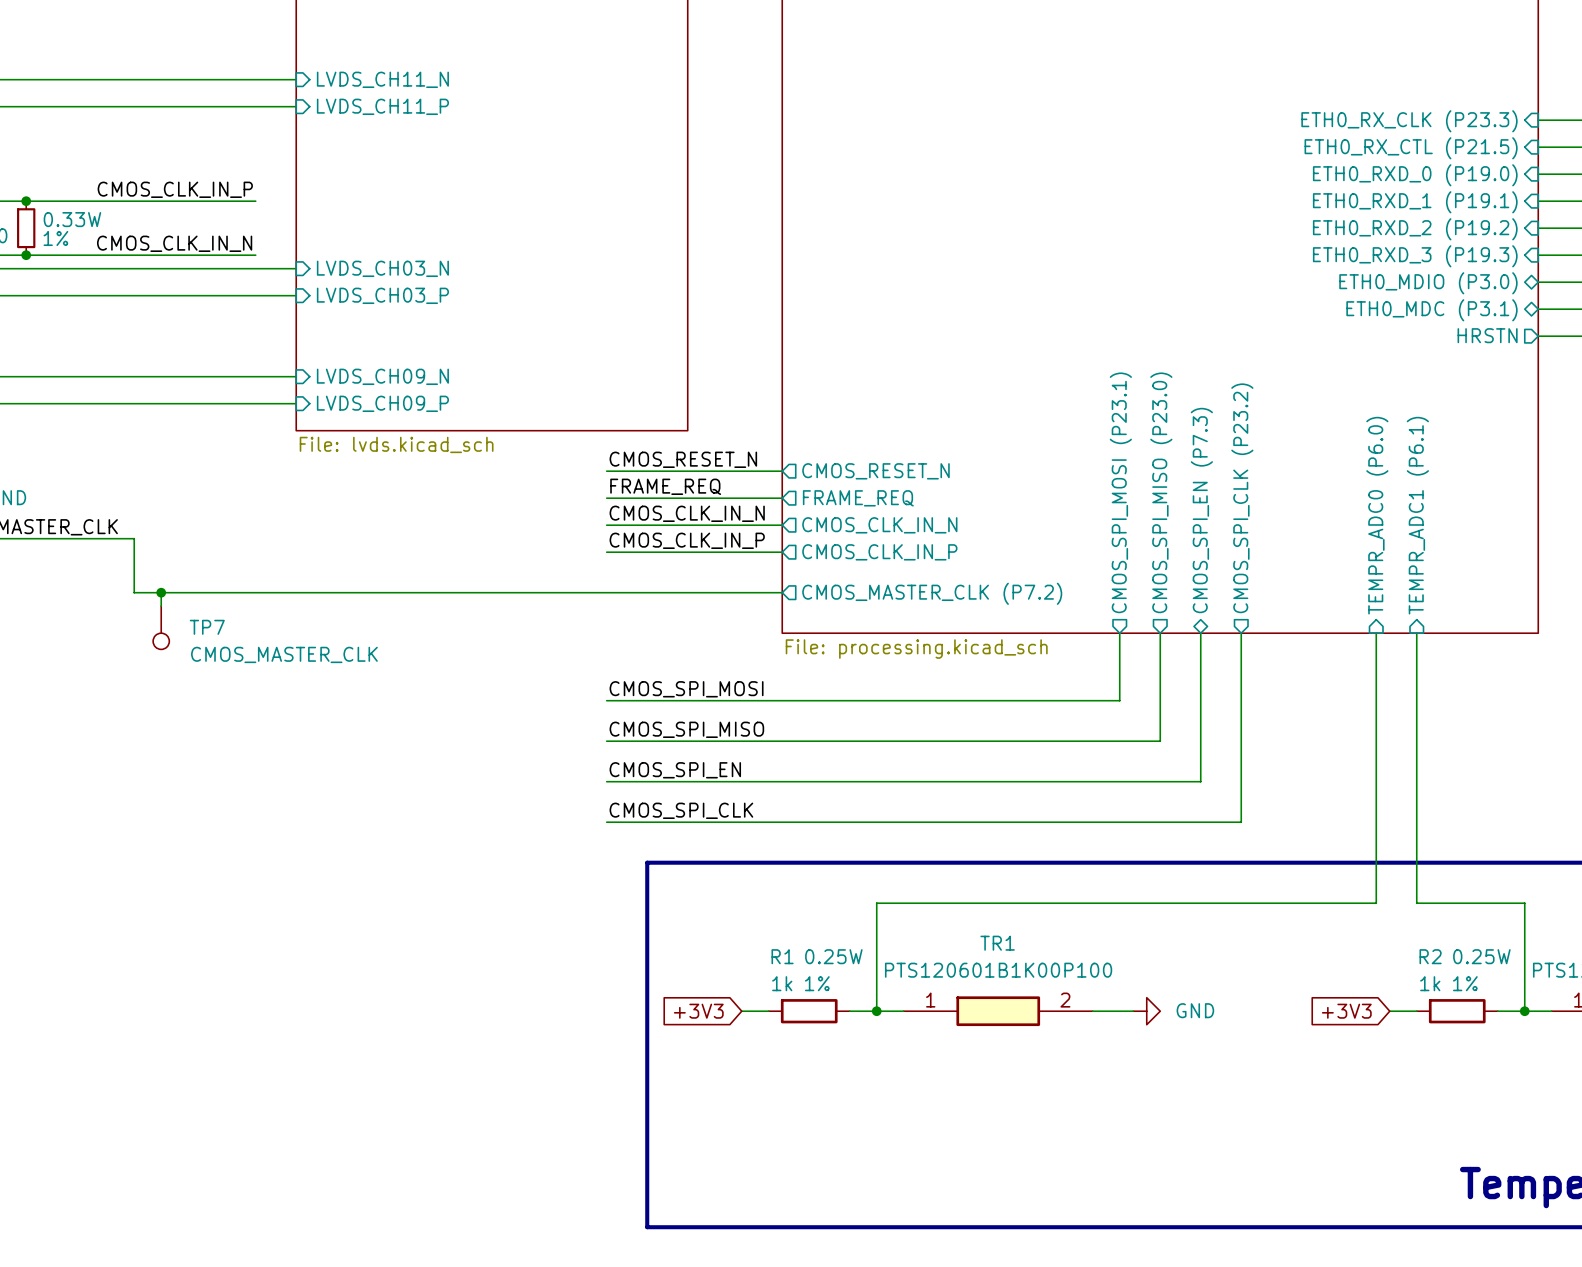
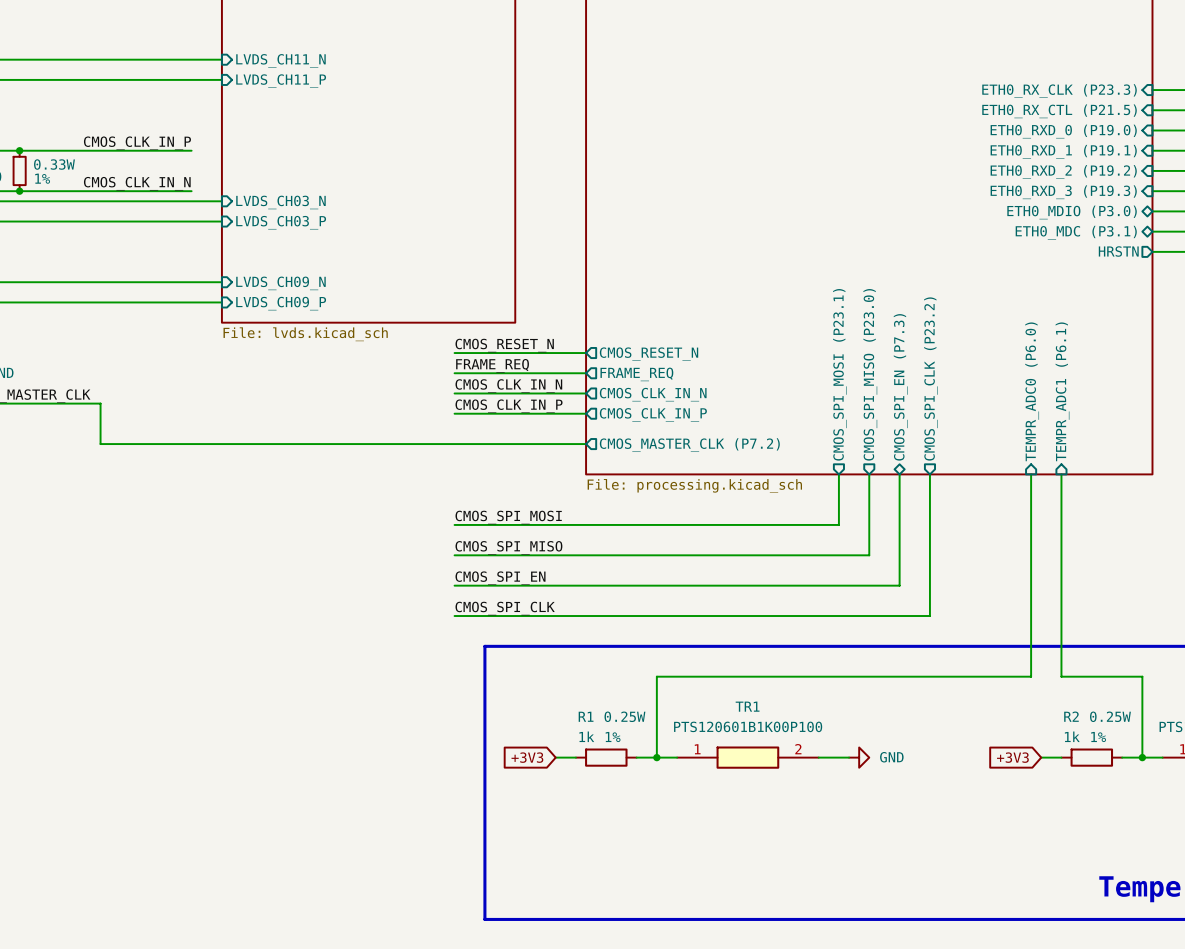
wire: (161, 592) (161, 606) -> none
junction: (161, 592) -> none
TP7: CMOS_MASTER_CLK (161, 627) -> none

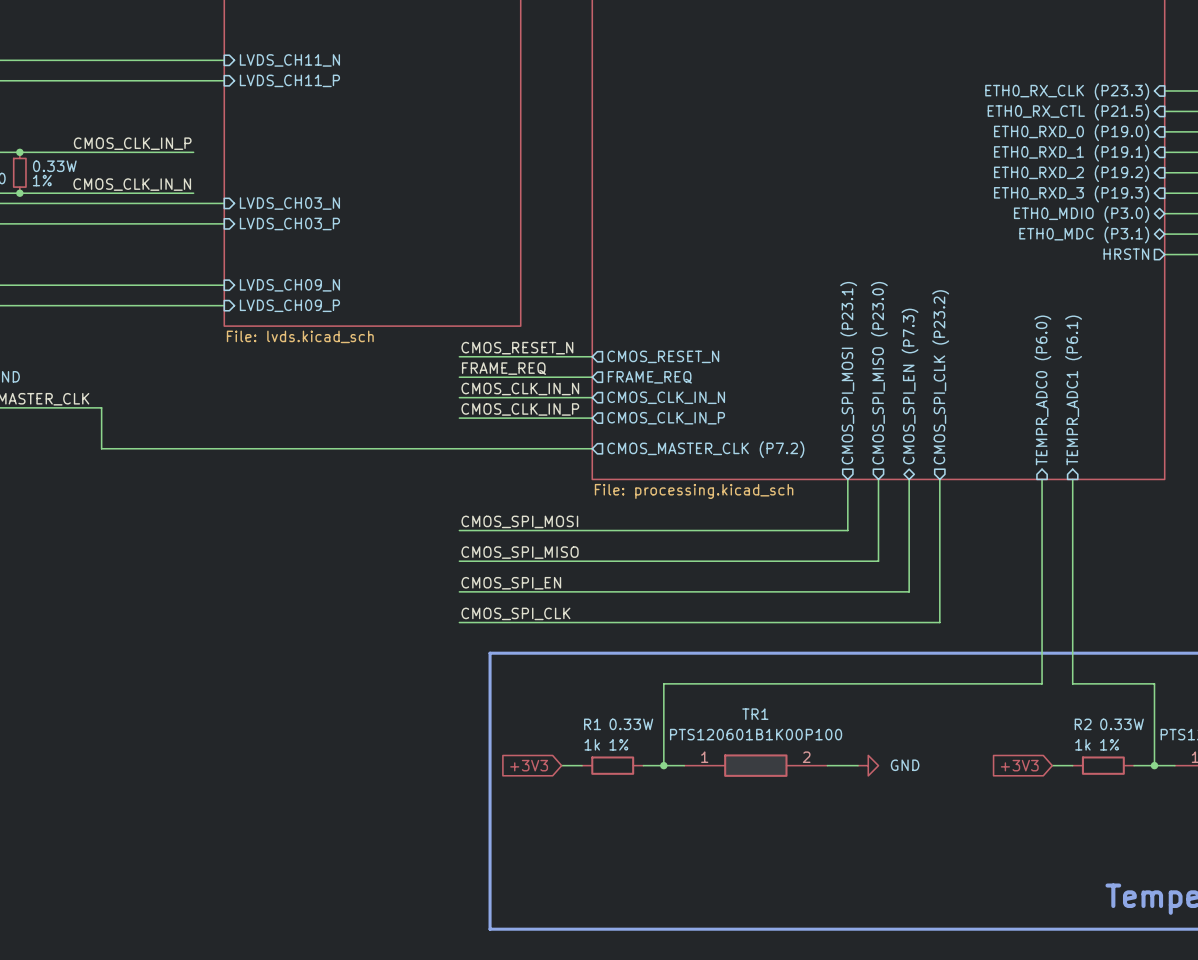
R1 text: 0.25W (624, 716) -> 0.33W (631, 724)
R2 text: 0.25W (1110, 716) -> 0.33W (1122, 724)

